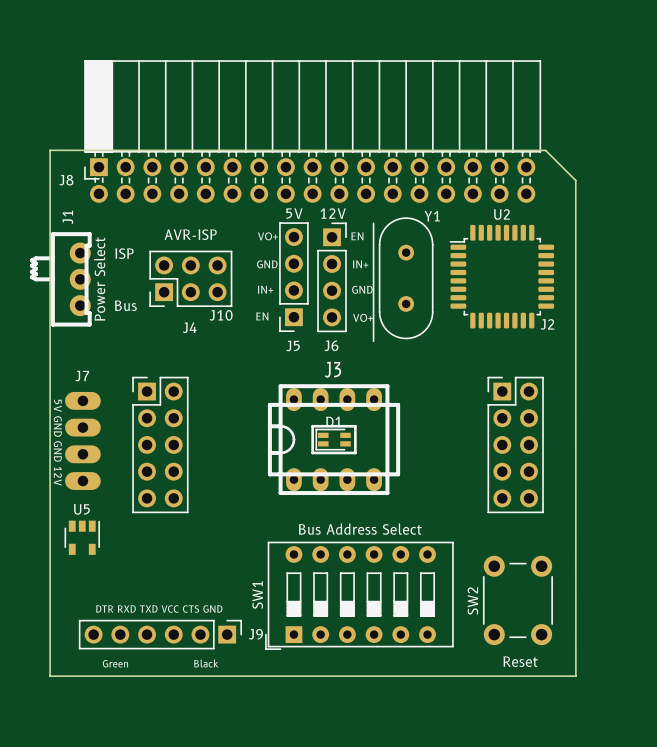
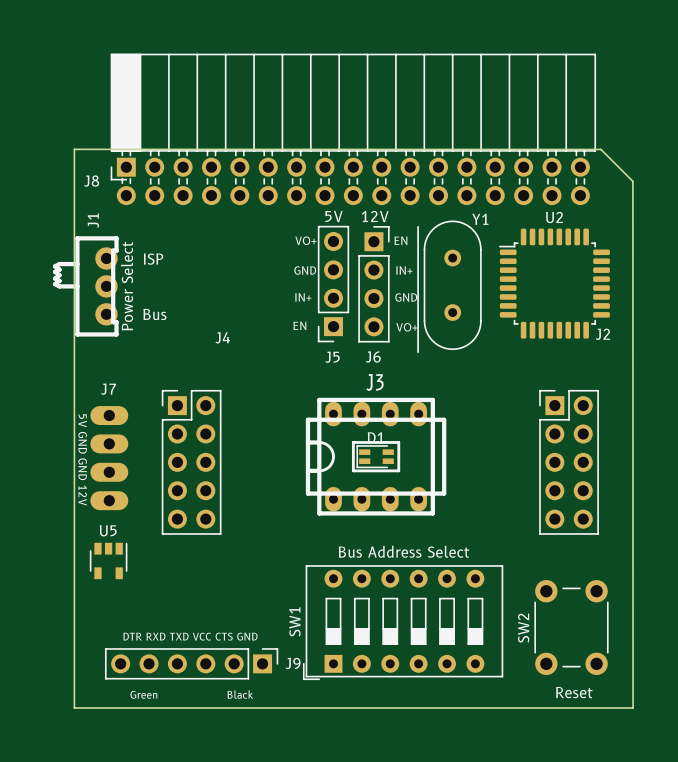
J10: AVR-ISP (190, 278) -> none

